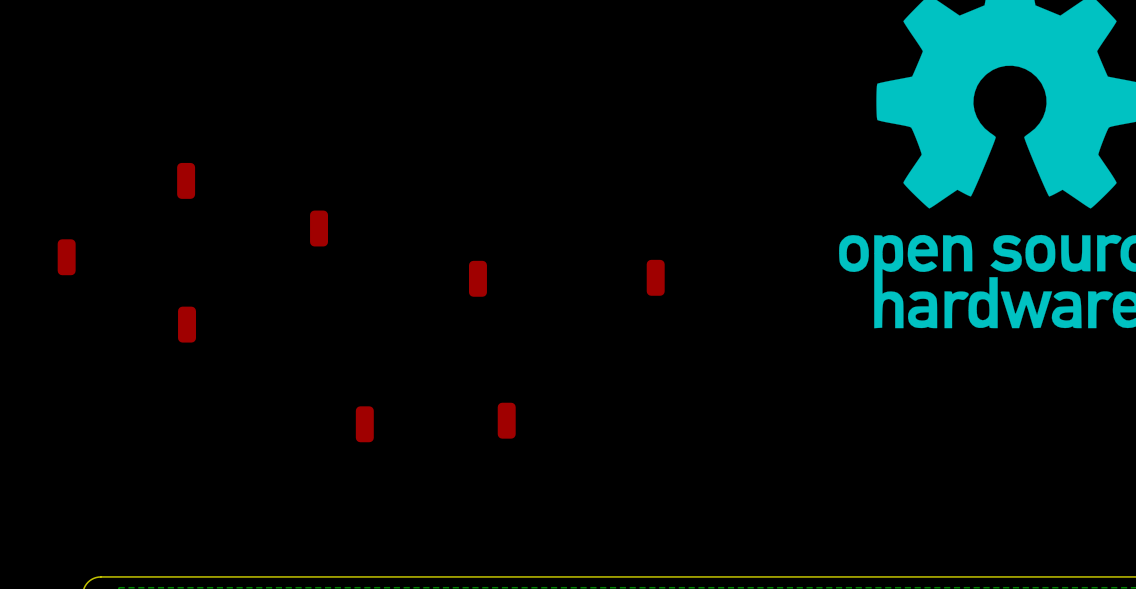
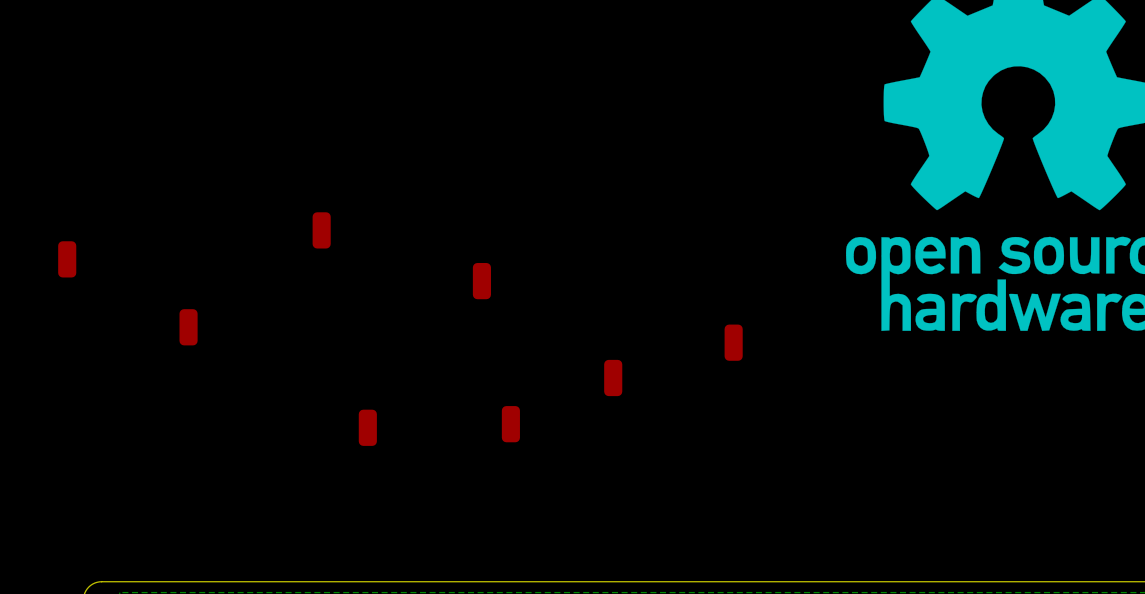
part: (186, 180) -> none
part: (655, 277) -> none
part: none -> (733, 342)
part: none -> (613, 377)

